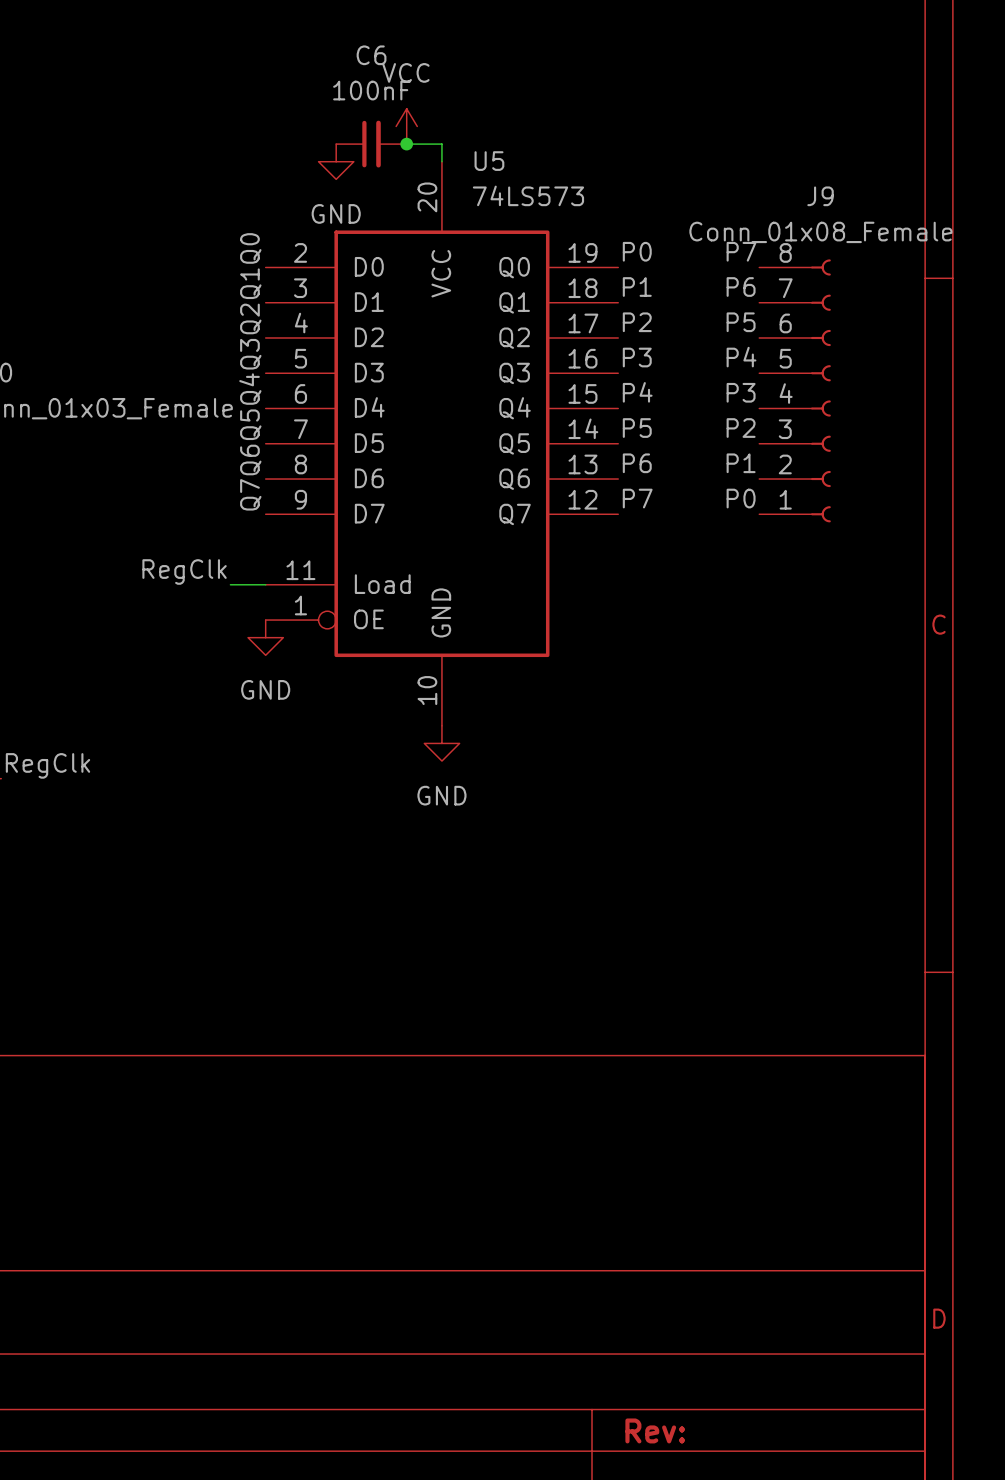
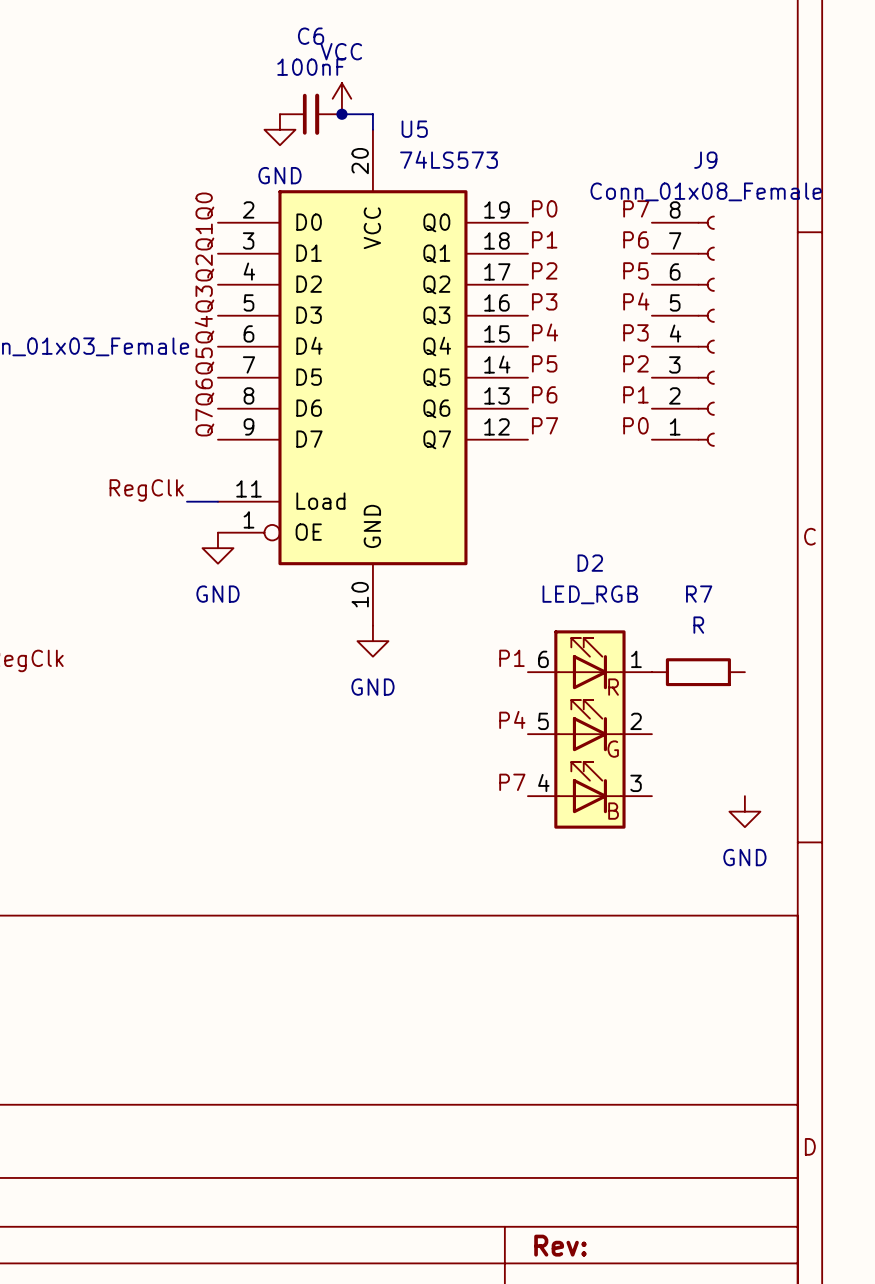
label: none -> P1 (511, 658)
R7: none -> R (698, 672)
label: none -> P4 (512, 719)
D2: none -> LED_RGB (589, 729)
label: none -> P7 (512, 782)
power symbol: none -> GND (744, 811)

